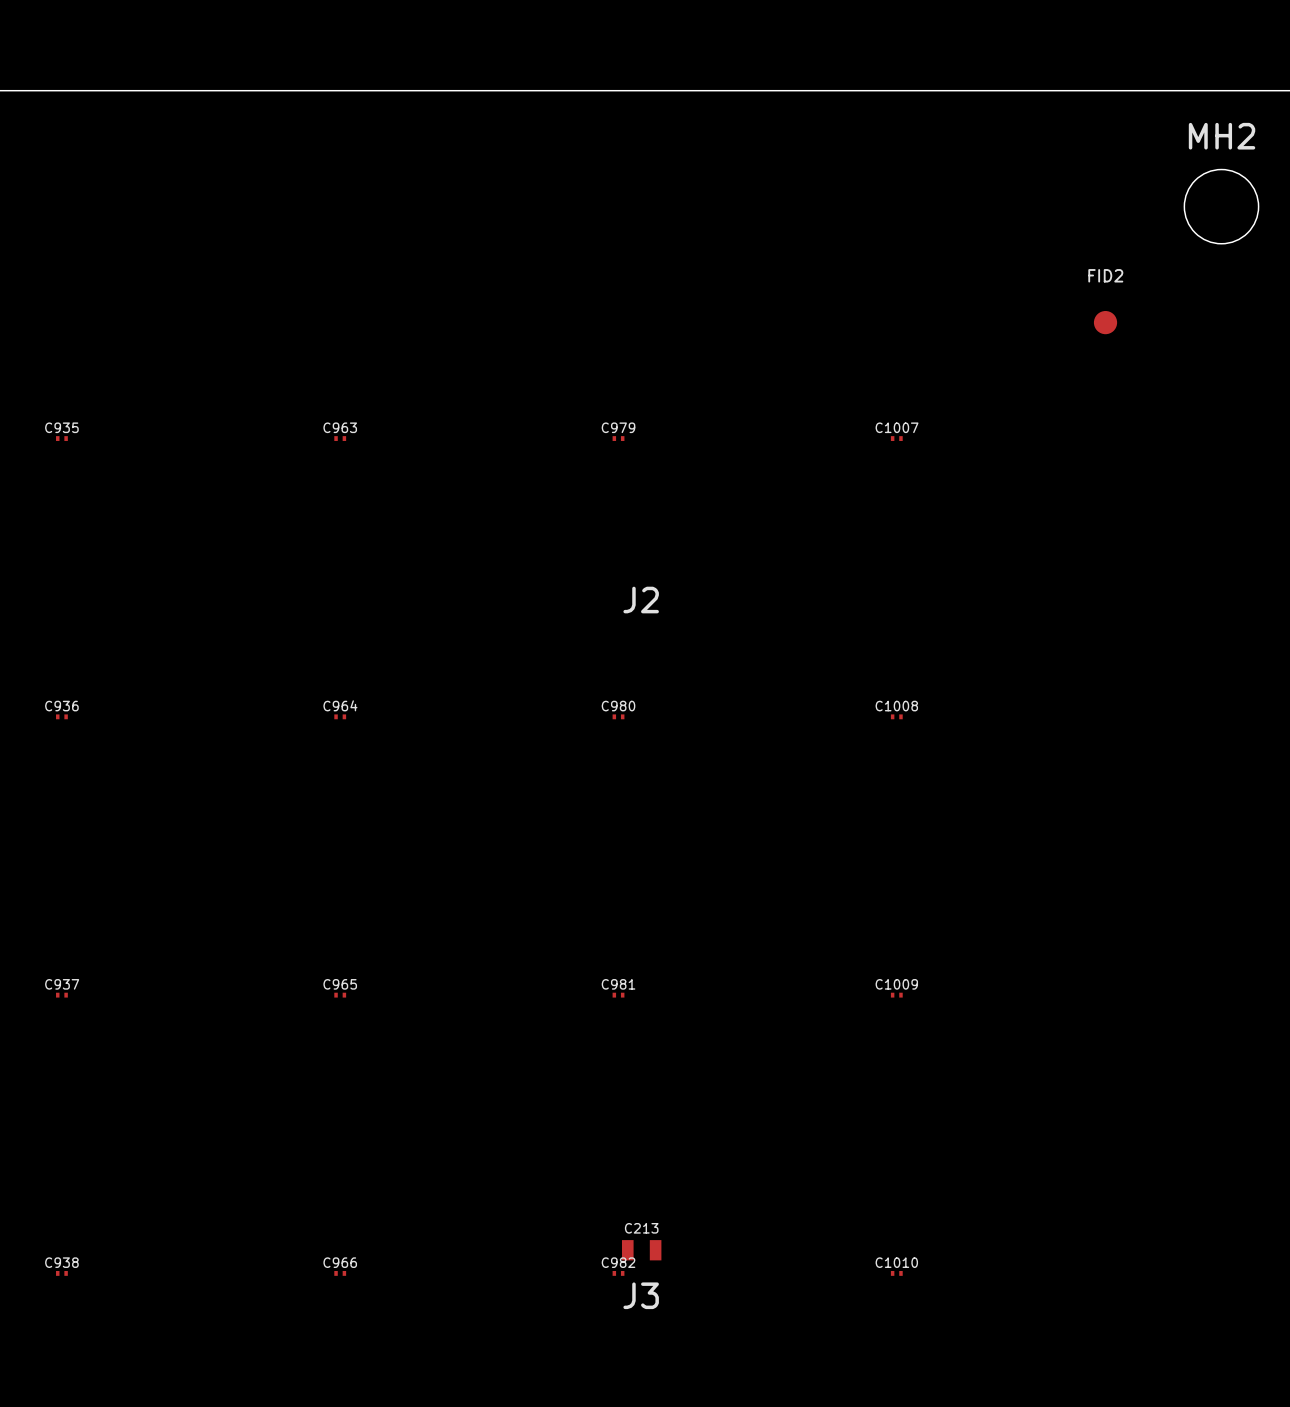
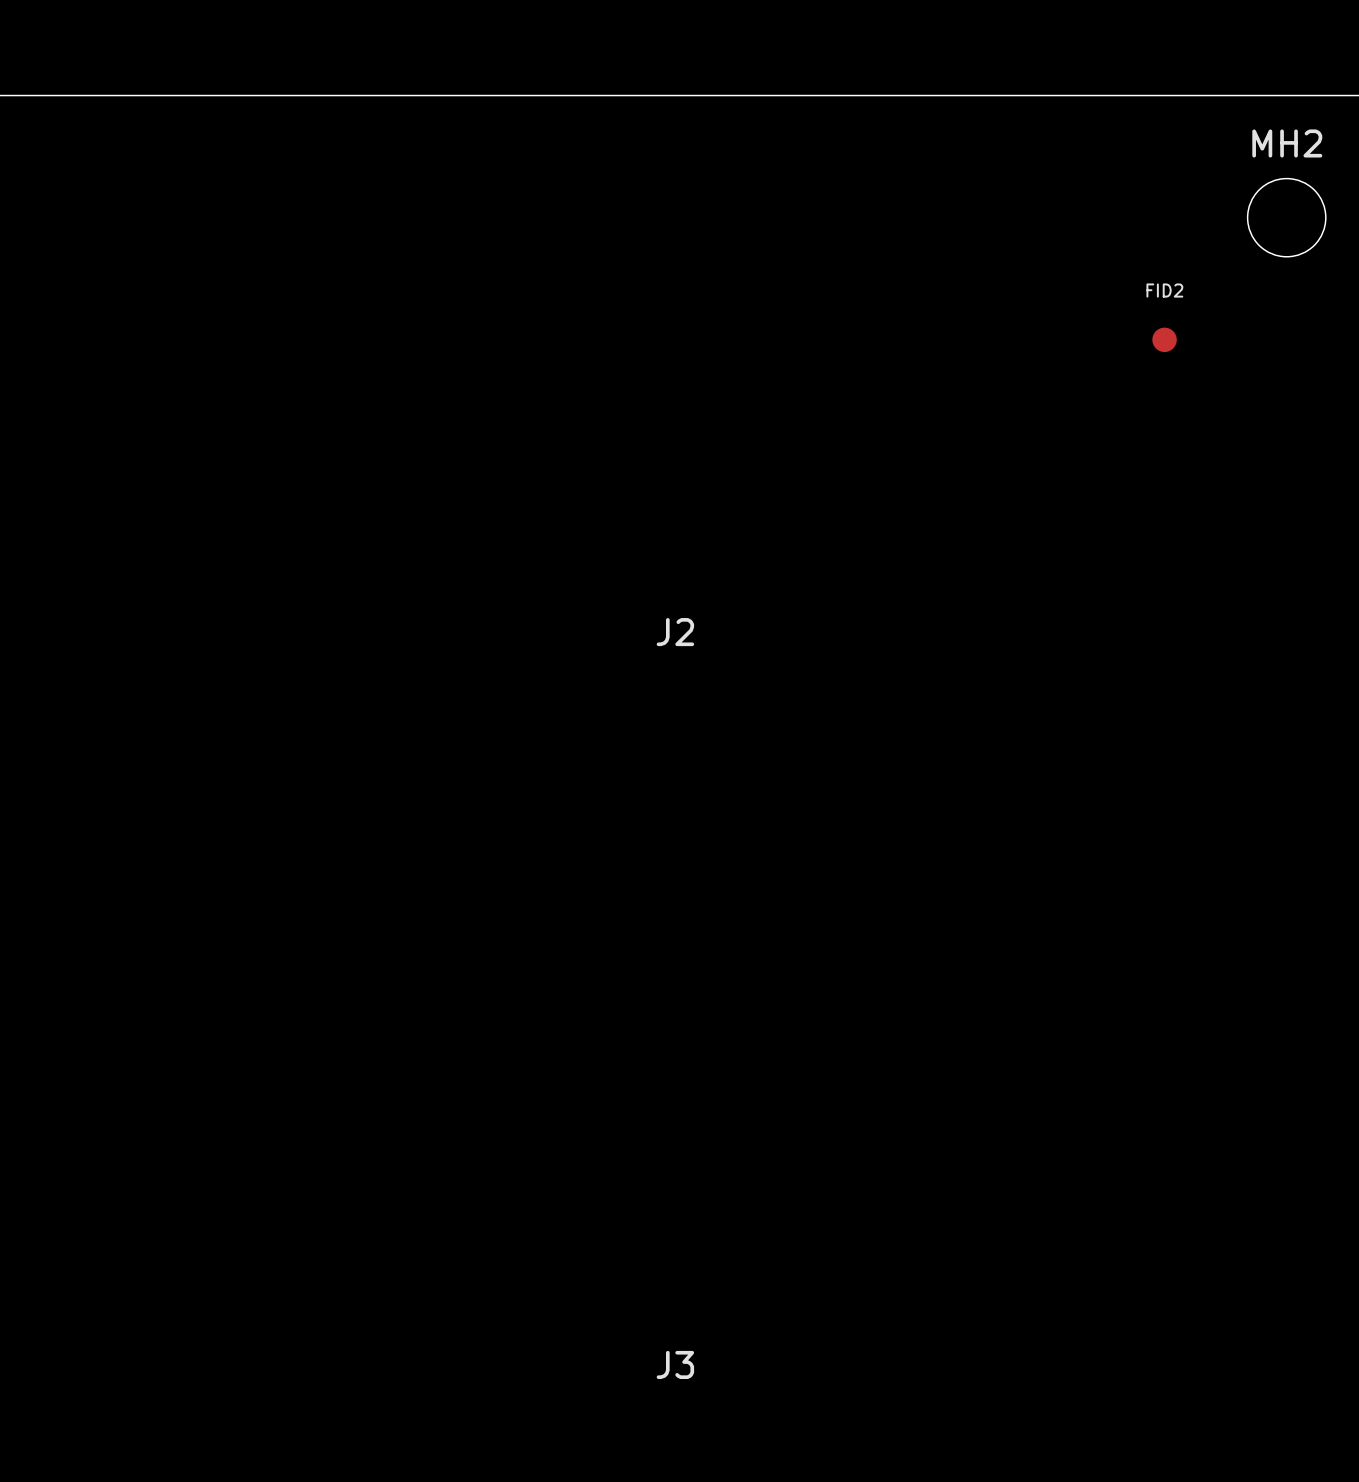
C935: (61, 438) -> none
C963: (340, 438) -> none
C979: (618, 438) -> none
C1007: (896, 438) -> none
C936: (61, 716) -> none
C964: (340, 716) -> none
C980: (618, 716) -> none
C1008: (896, 716) -> none
C937: (61, 995) -> none
C965: (340, 995) -> none
C981: (618, 995) -> none
C1009: (896, 995) -> none
C213: (641, 1250) -> none
C938: (61, 1273) -> none
C966: (340, 1273) -> none
C982: (618, 1273) -> none
C1010: (896, 1273) -> none

